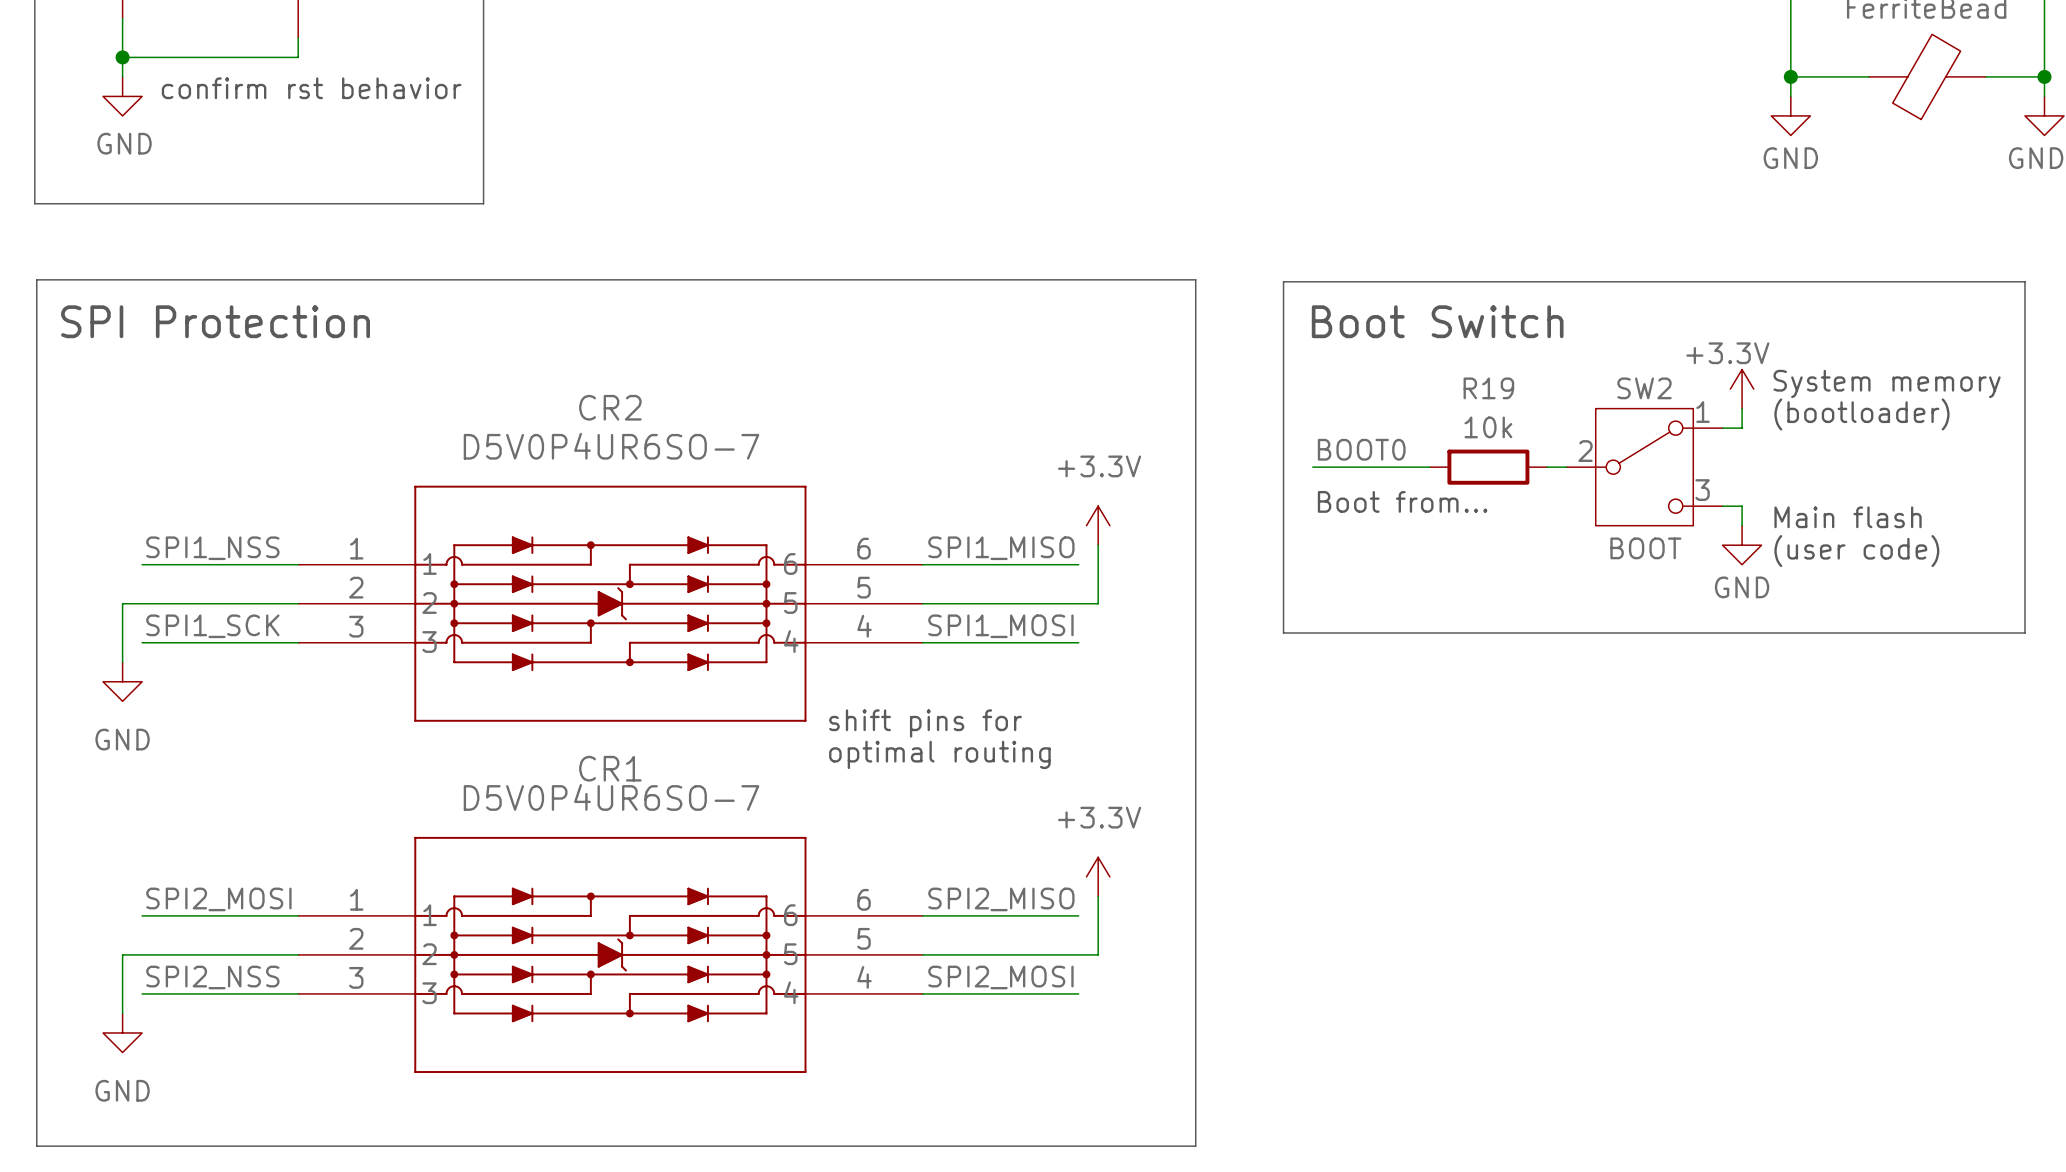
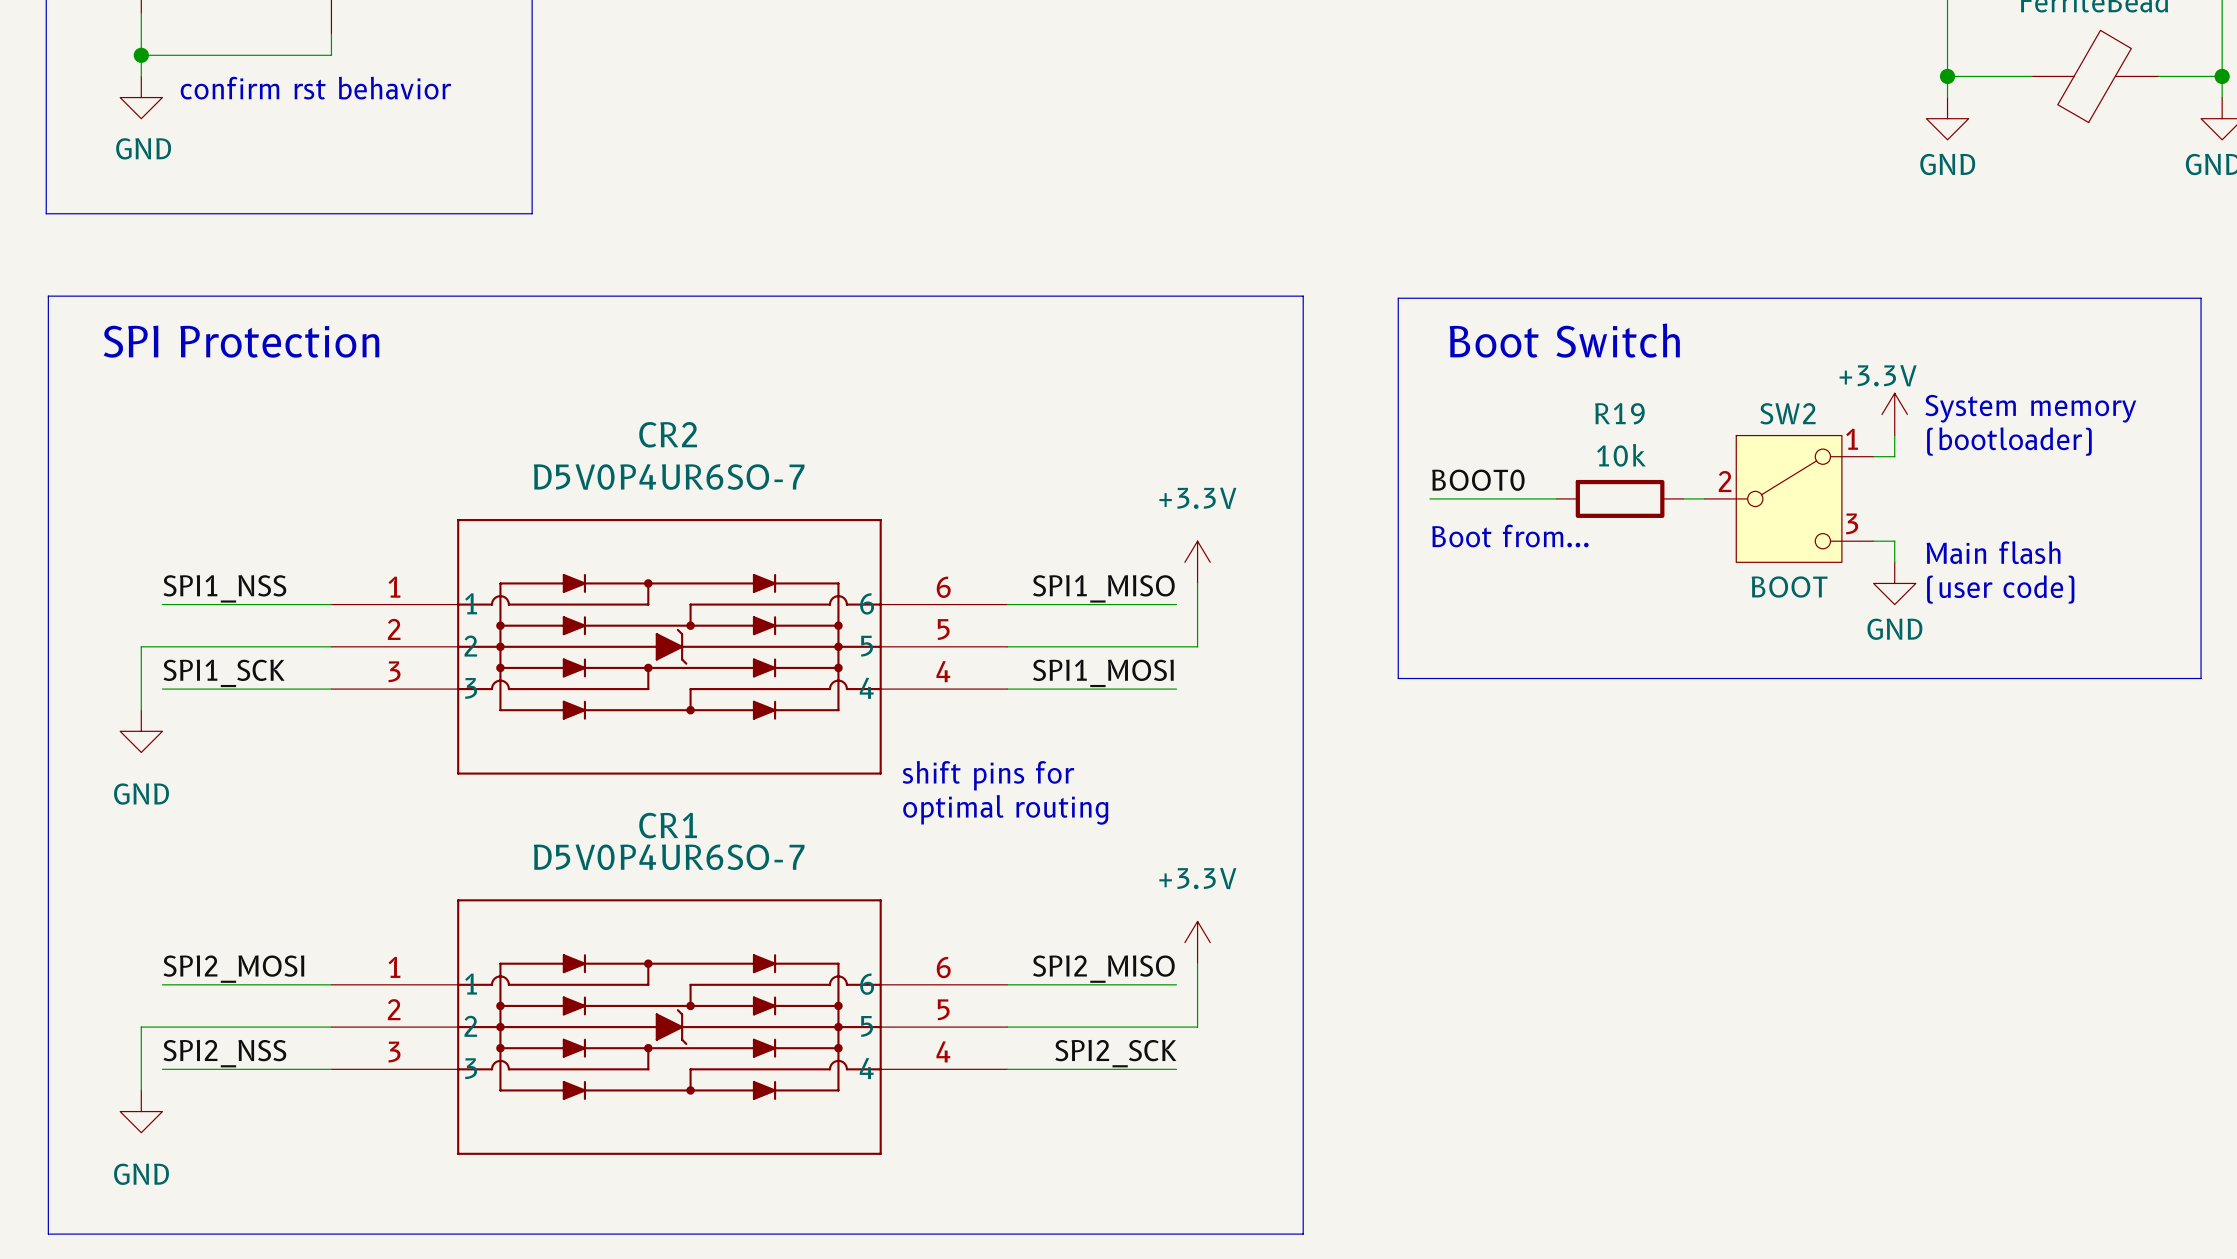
label: SPI2_MOSI (1000, 977) -> SPI2_SCK (1115, 1053)

